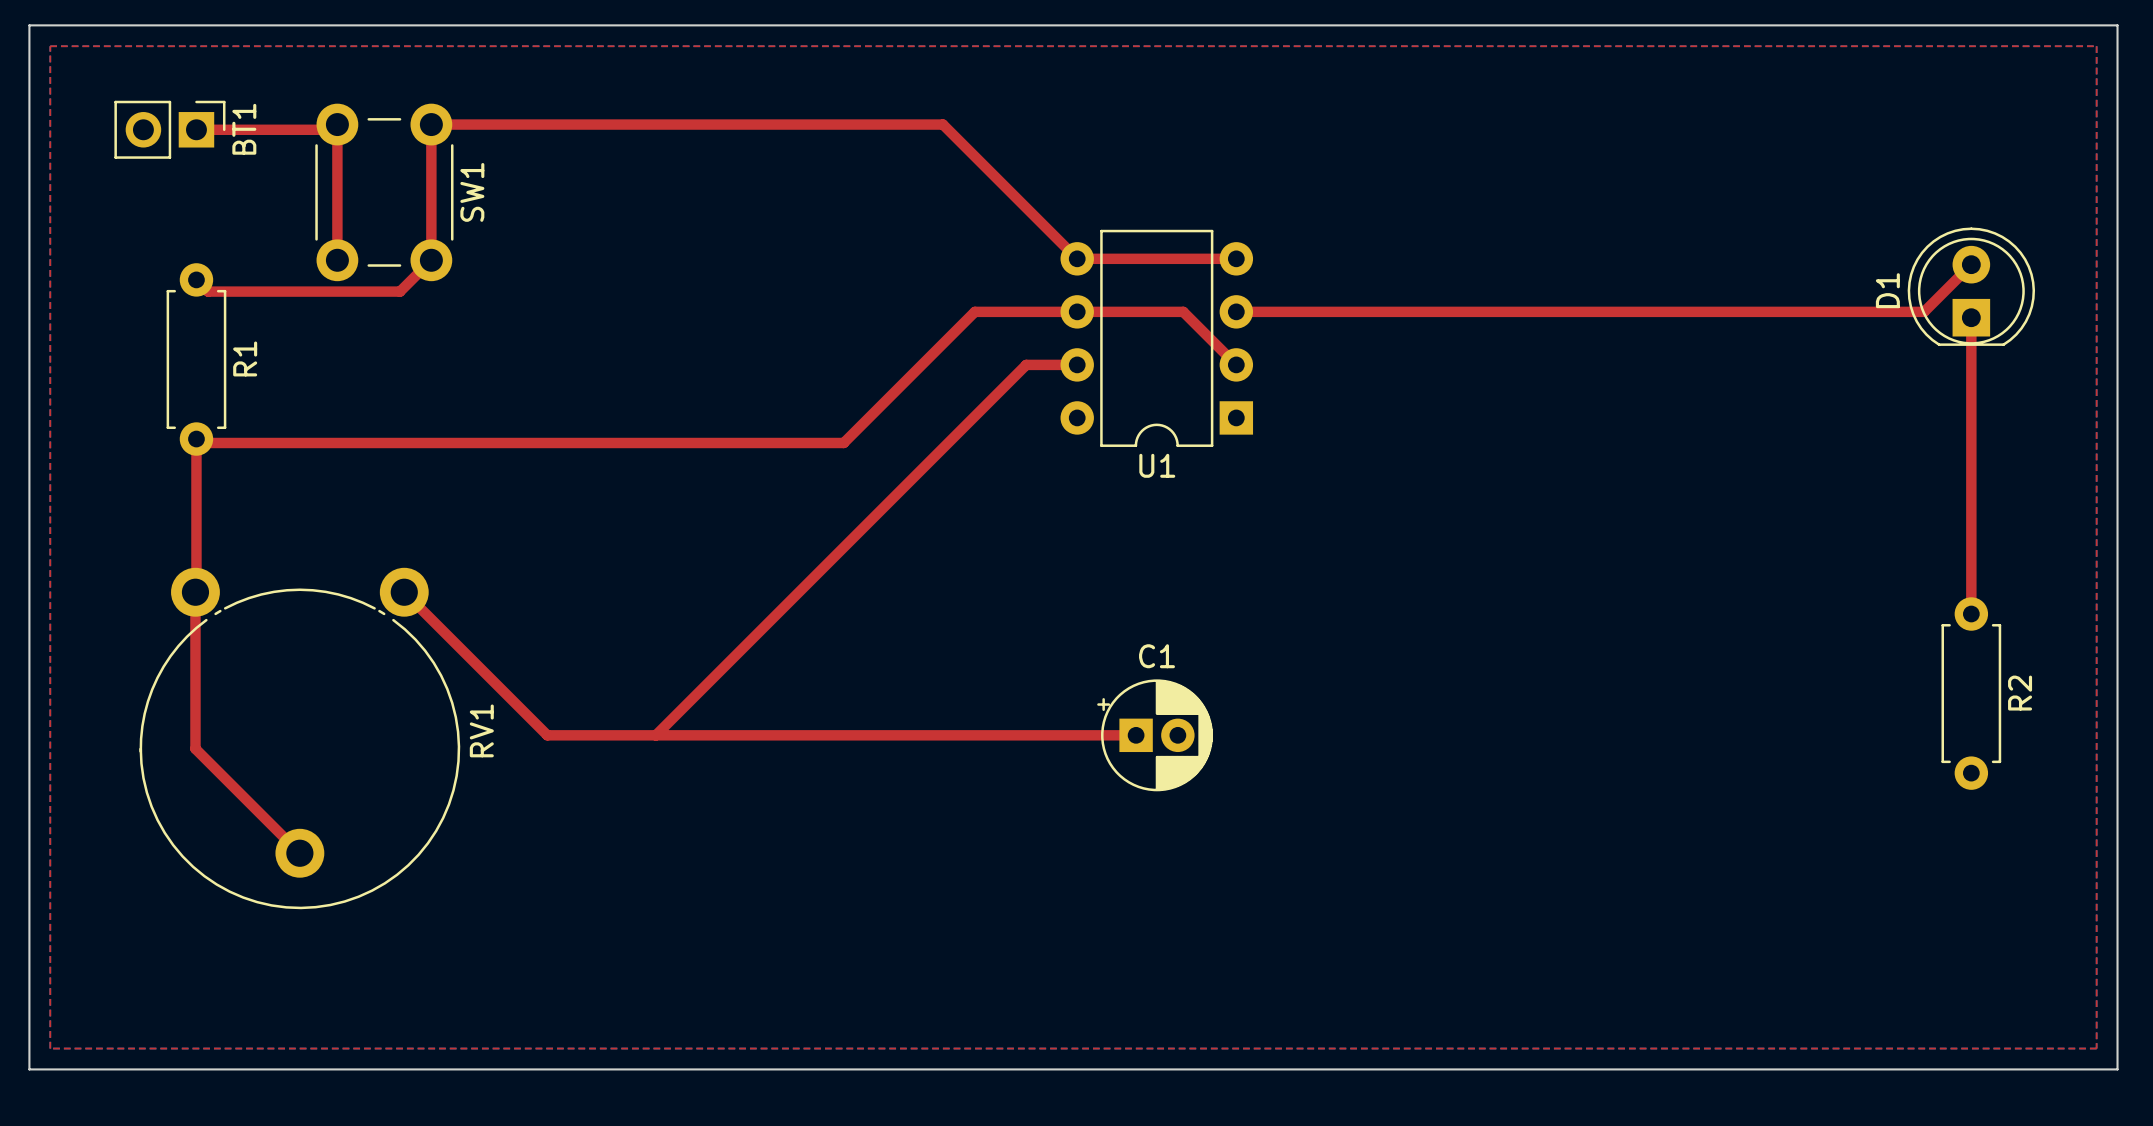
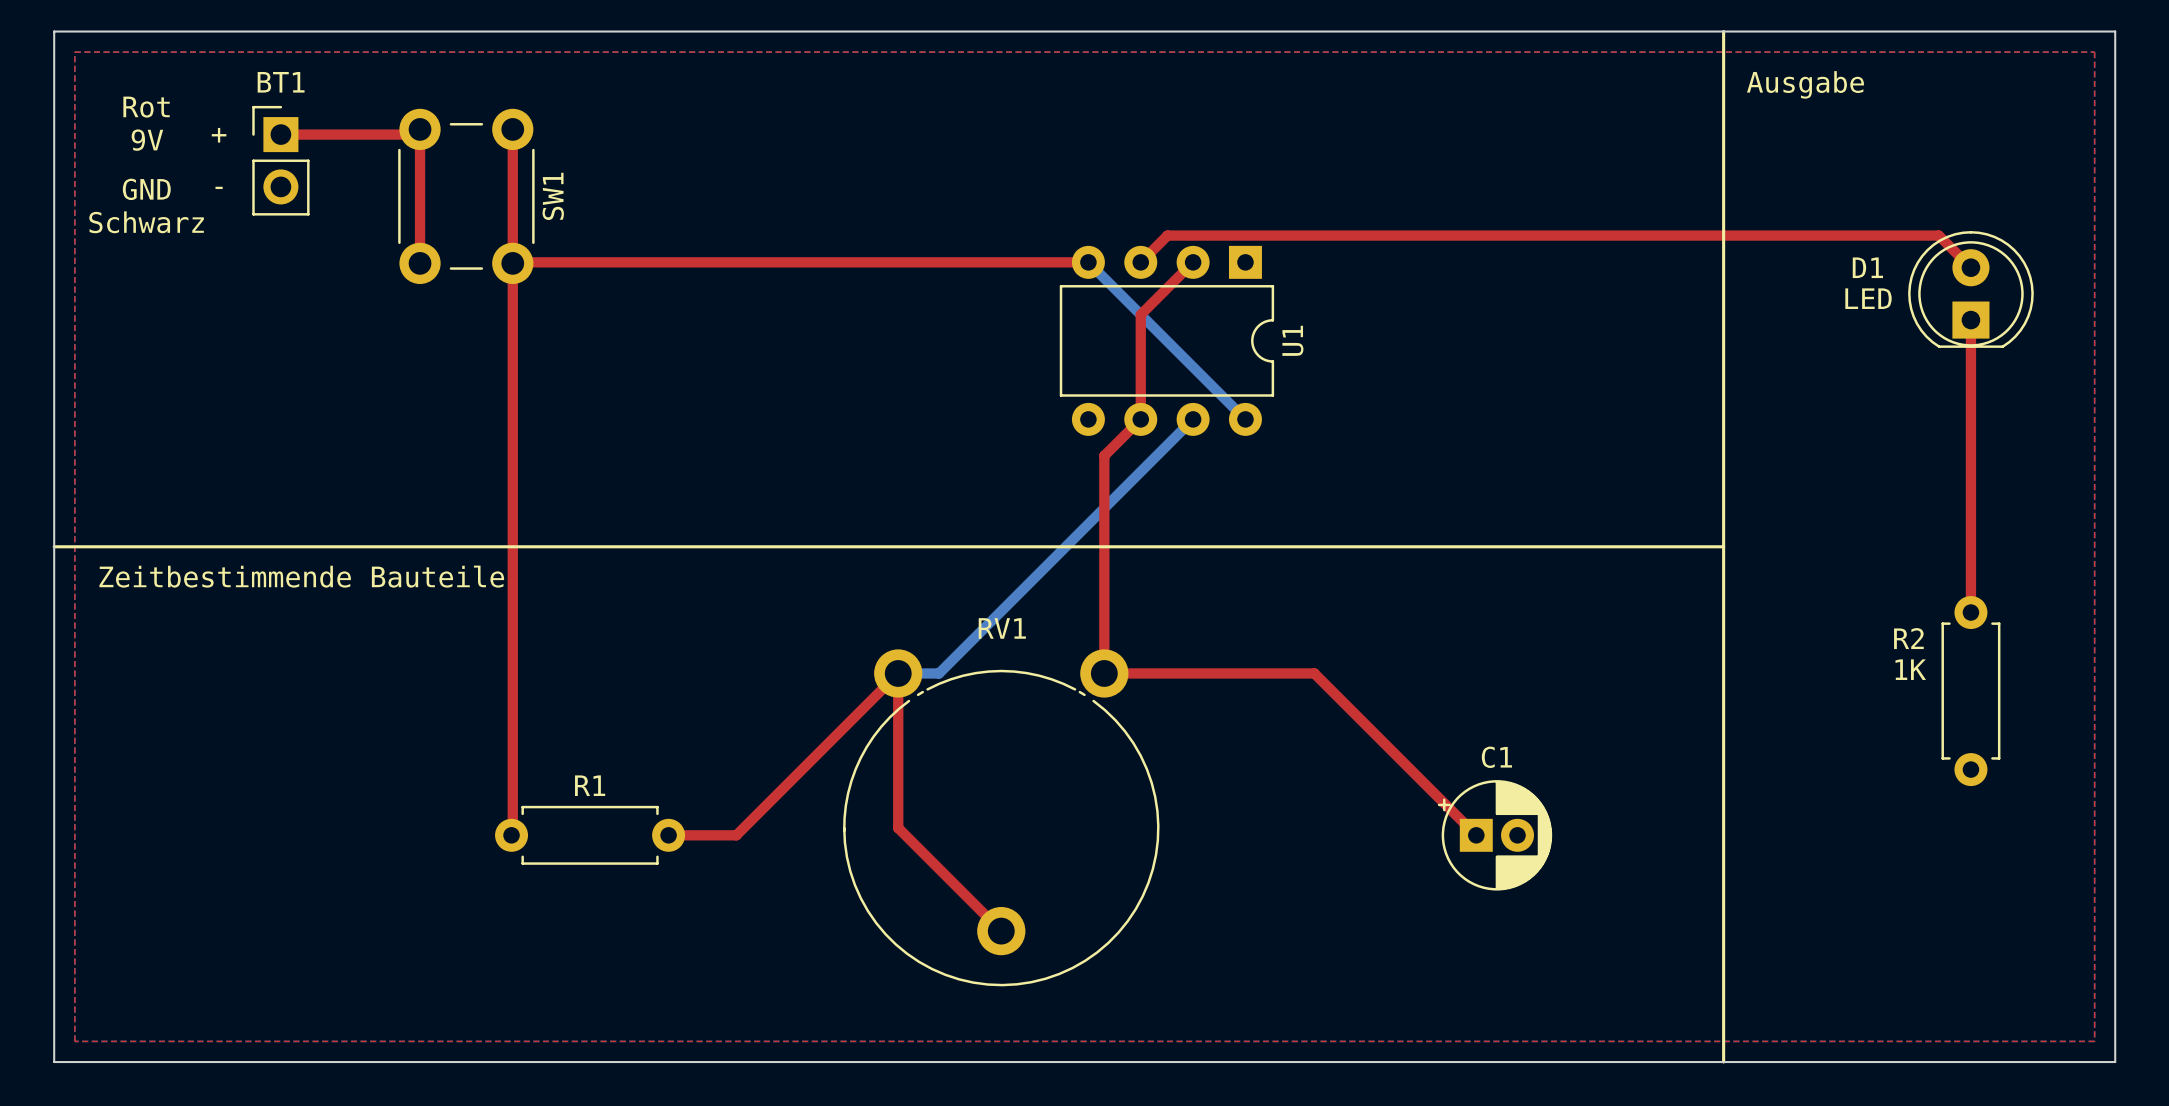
line: none -> (1723, 31) (1723, 1062)
text: none -> Ausgabe (1805, 84)
text: none -> Rot (146, 107)
top track: none -> (512, 129) (511, 835)
BT1 rotation: 0° (169, 129) -> 90° counterclockwise (280, 160)
BT1 position: (169, 129) -> (280, 160)
top track: (196, 129) (259, 129) -> none
top track: (332, 129) (337, 124) (337, 260) -> (353, 134) (414, 134) (420, 129) (420, 263)
text: none -> + (219, 135)
text: none -> 9V (147, 140)
text: none -> - (219, 187)
text: none -> GND (146, 189)
SW1 position: (384, 192) -> (466, 196)
text: none -> Schwarz (146, 222)
top track: (1236, 258) (1077, 258) (942, 124) (431, 124) (431, 260) (400, 291) (208, 291) (196, 279) -> none
top track: none -> (1088, 262) (512, 263)
bottom track: none -> (1088, 262) (1245, 419)
top track: none -> (1193, 262) (1140, 314) (1140, 419) (1104, 455) (1104, 673) (1314, 673) (1476, 835)
top track: (1971, 264) (1924, 311) (1236, 311) -> (1970, 267) (1938, 235) (1167, 235) (1140, 262)
D1 name rotation: 0° (1887, 290) -> 90° clockwise (1867, 267)
text: none -> LED (1868, 298)
U1 rotation: 0° (1156, 338) -> 90° counterclockwise (1166, 340)
R1 name position: R1 (245, 358) -> R1 (590, 785)
R1 rotation: 0° (196, 359) -> 90° clockwise (590, 835)
R1 position: (196, 359) -> (590, 835)
top track: (1077, 364) (1026, 364) (655, 735) -> none
top track: (1236, 364) (1183, 311) (974, 311) (843, 442) (200, 442) (196, 439) (195, 748) (299, 853) -> none
bottom track: none -> (1193, 419) (939, 673) (898, 673)
line: none -> (54, 546) (1723, 546)
text: none -> Zeitbestimmende Bauteile (301, 576)
top track: (404, 592) (547, 735) (1136, 735) -> none
text: none -> 1K (1910, 669)
R2 name rotation: 0° (2020, 693) -> 90° clockwise (1908, 638)
R2 name position: R2 (2020, 693) -> R2 (1908, 638)
RV1 name rotation: 0° (481, 730) -> 90° clockwise (1002, 628)
RV1 name position: RV1 (481, 730) -> RV1 (1002, 628)
C1 position: (1155, 735) -> (1495, 835)
RV1 position: (299, 738) -> (1001, 817)
top track: none -> (668, 835) (736, 835) (898, 673) (898, 828) (1001, 931)

